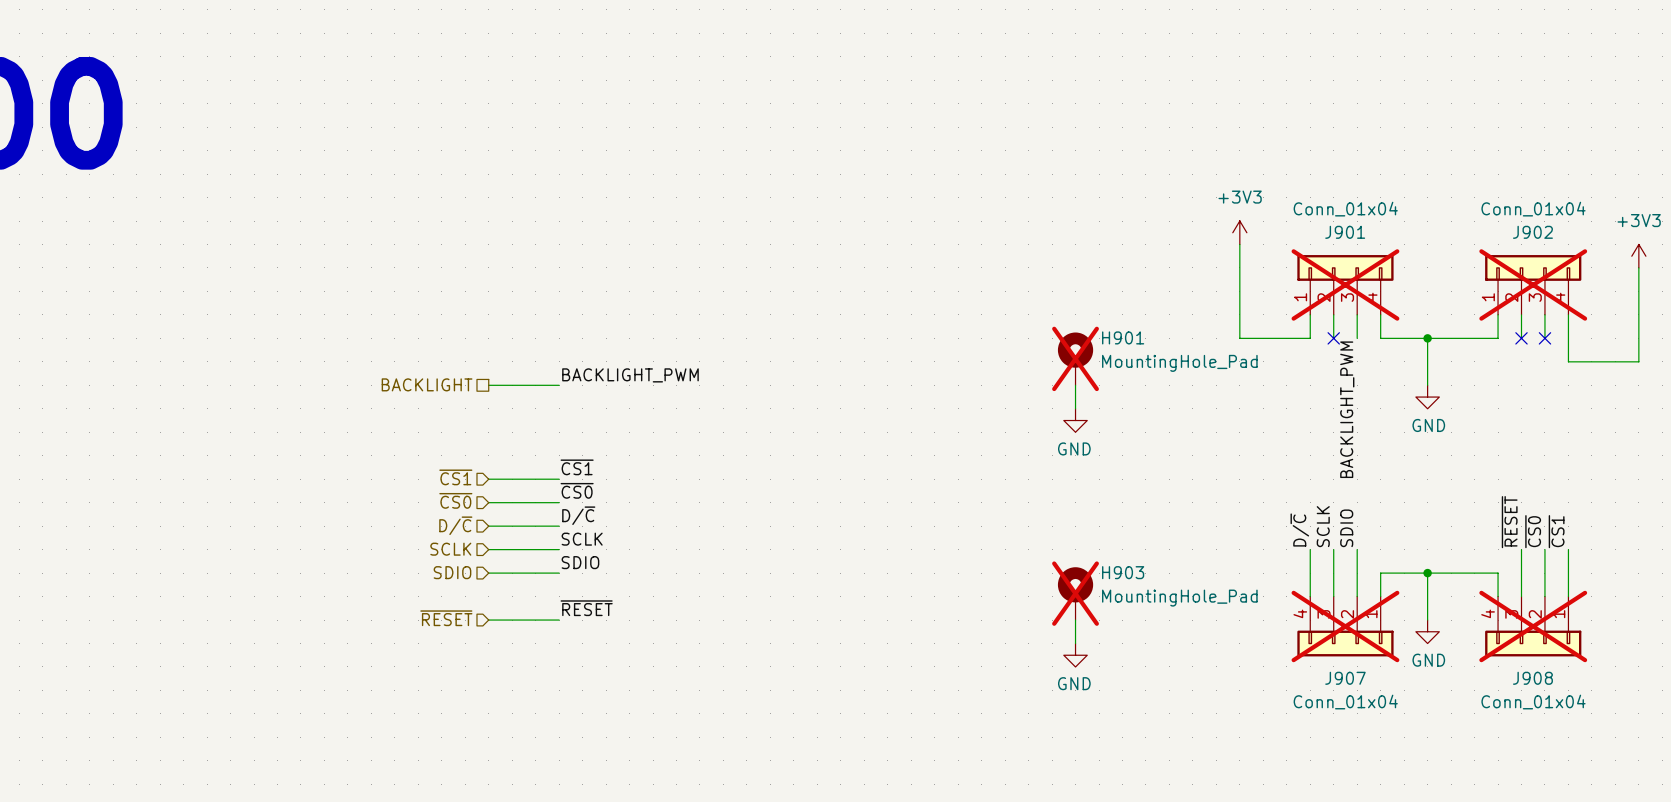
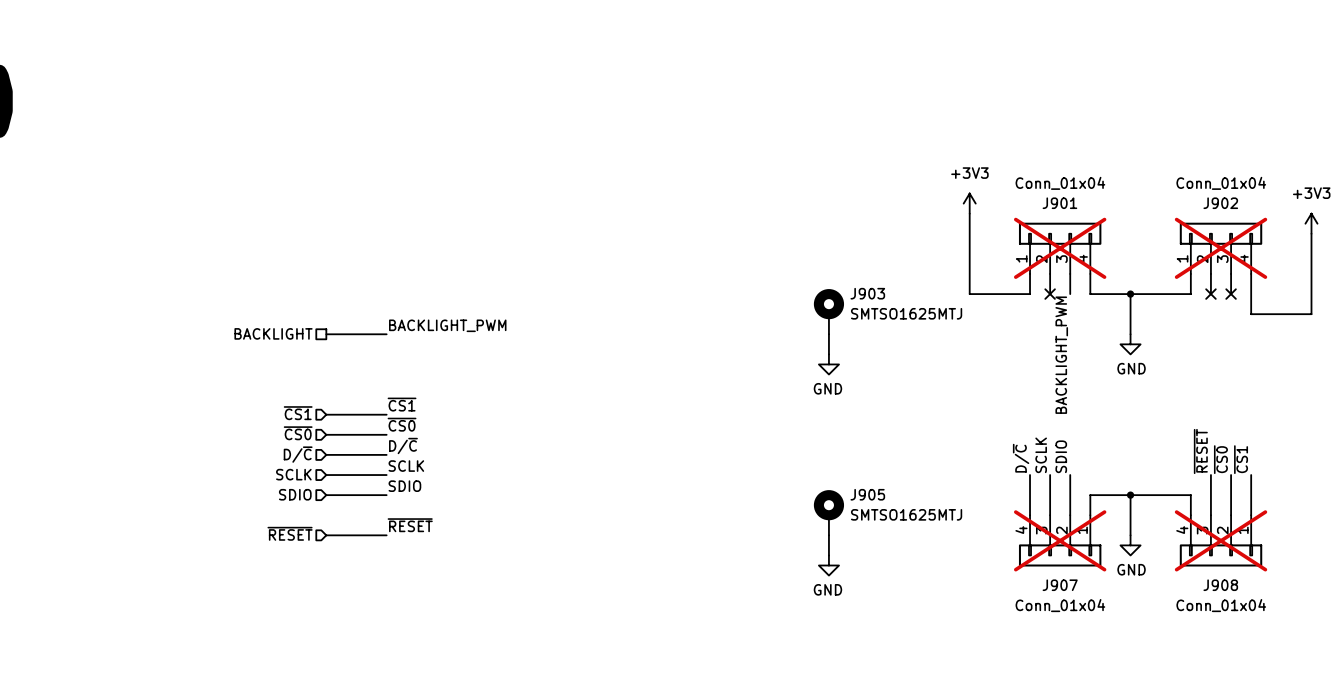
H901 name: H901 (1123, 337) -> J903 (867, 293)
H901 do-not-place cross: (1075, 358) -> none
H901 value: MountingHole_Pad (1179, 363) -> SMTSO1625MTJ (906, 313)
H903 name: H903 (1123, 572) -> J905 (867, 494)
H903 do-not-place cross: (1075, 593) -> none
H903 value: MountingHole_Pad (1179, 598) -> SMTSO1625MTJ (906, 514)

